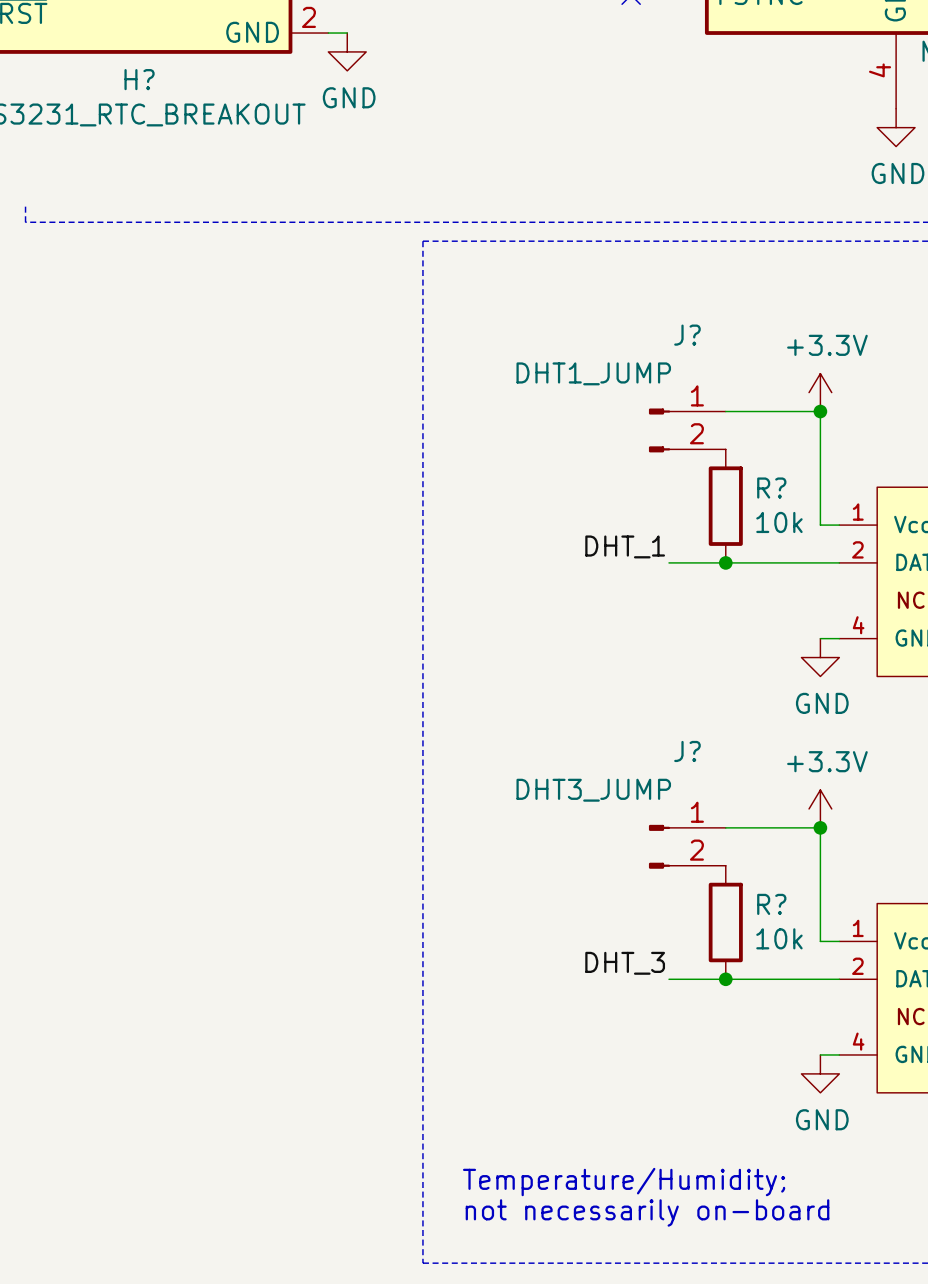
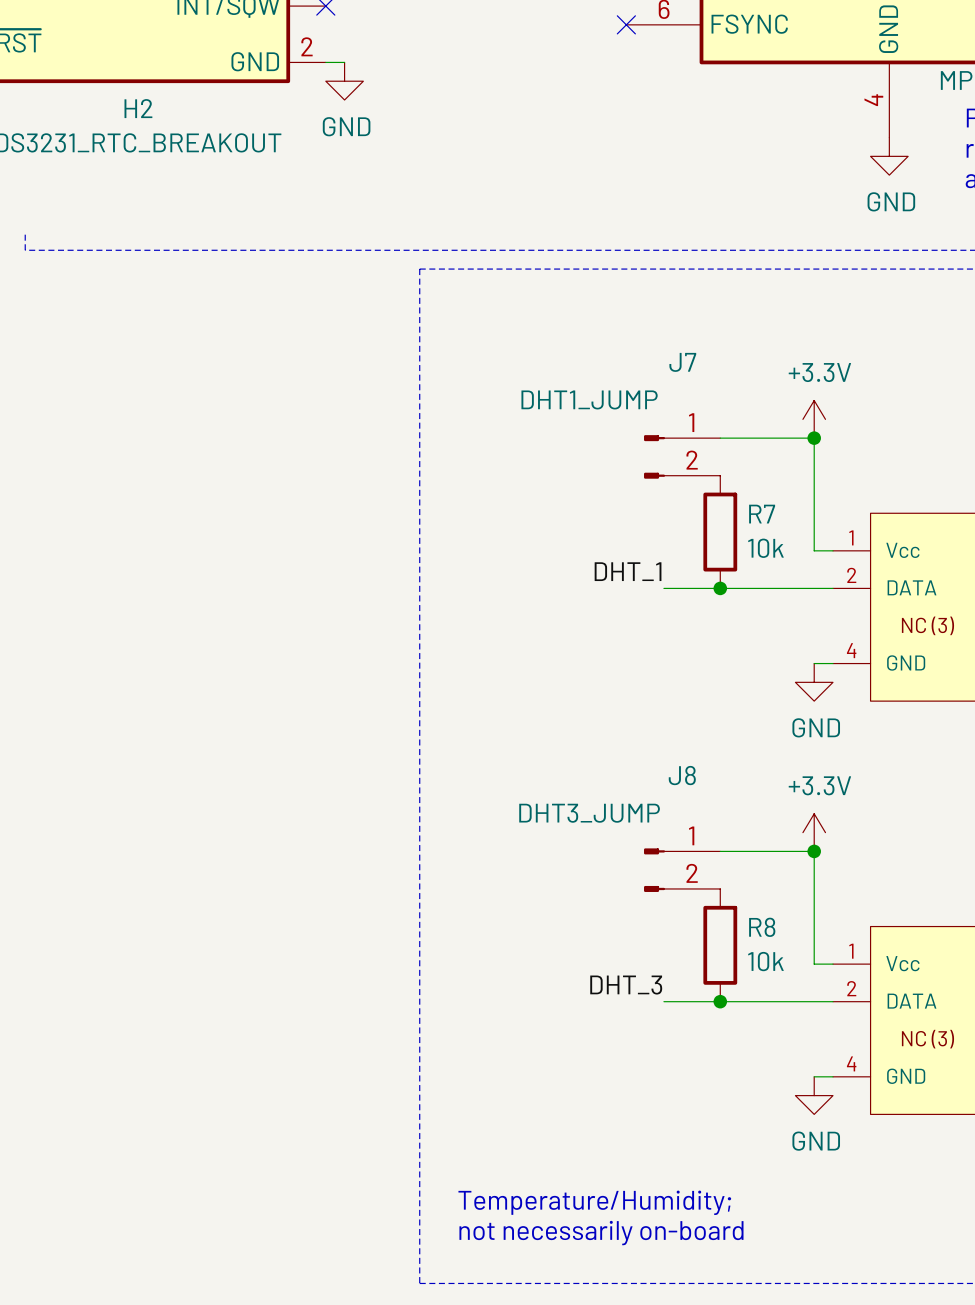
H? name: H? (139, 79) -> H2 (138, 108)
J? name: J? (687, 335) -> J7 (682, 362)
R? name: R? (771, 488) -> R7 (762, 514)
J? name: J? (687, 751) -> J8 (682, 775)
R? name: R? (771, 904) -> R8 (762, 927)

